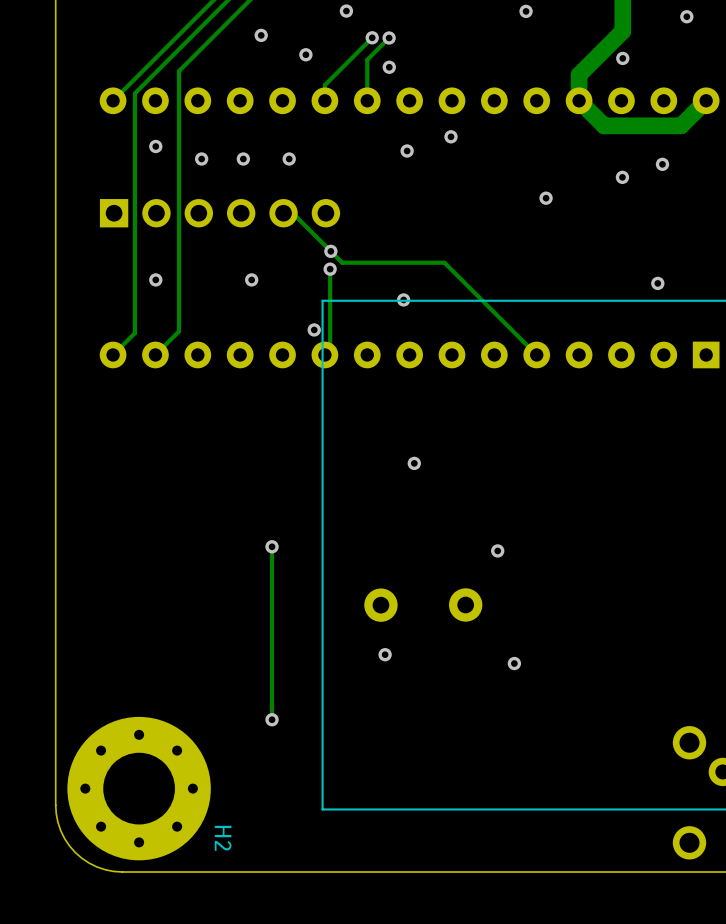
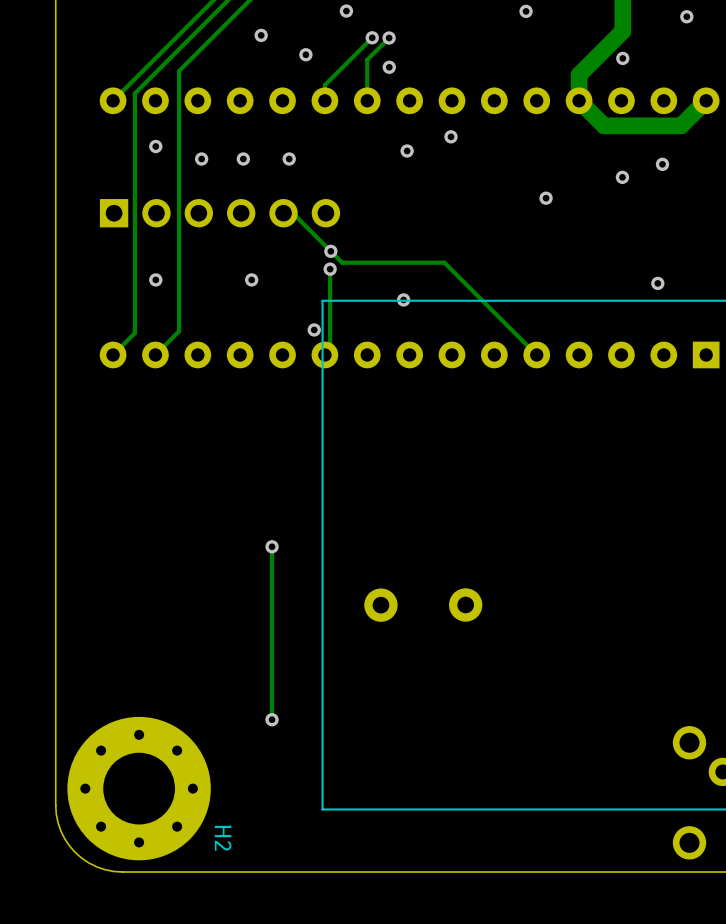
via: (414, 463) -> none
via: (497, 550) -> none
via: (385, 654) -> none
via: (514, 663) -> none

